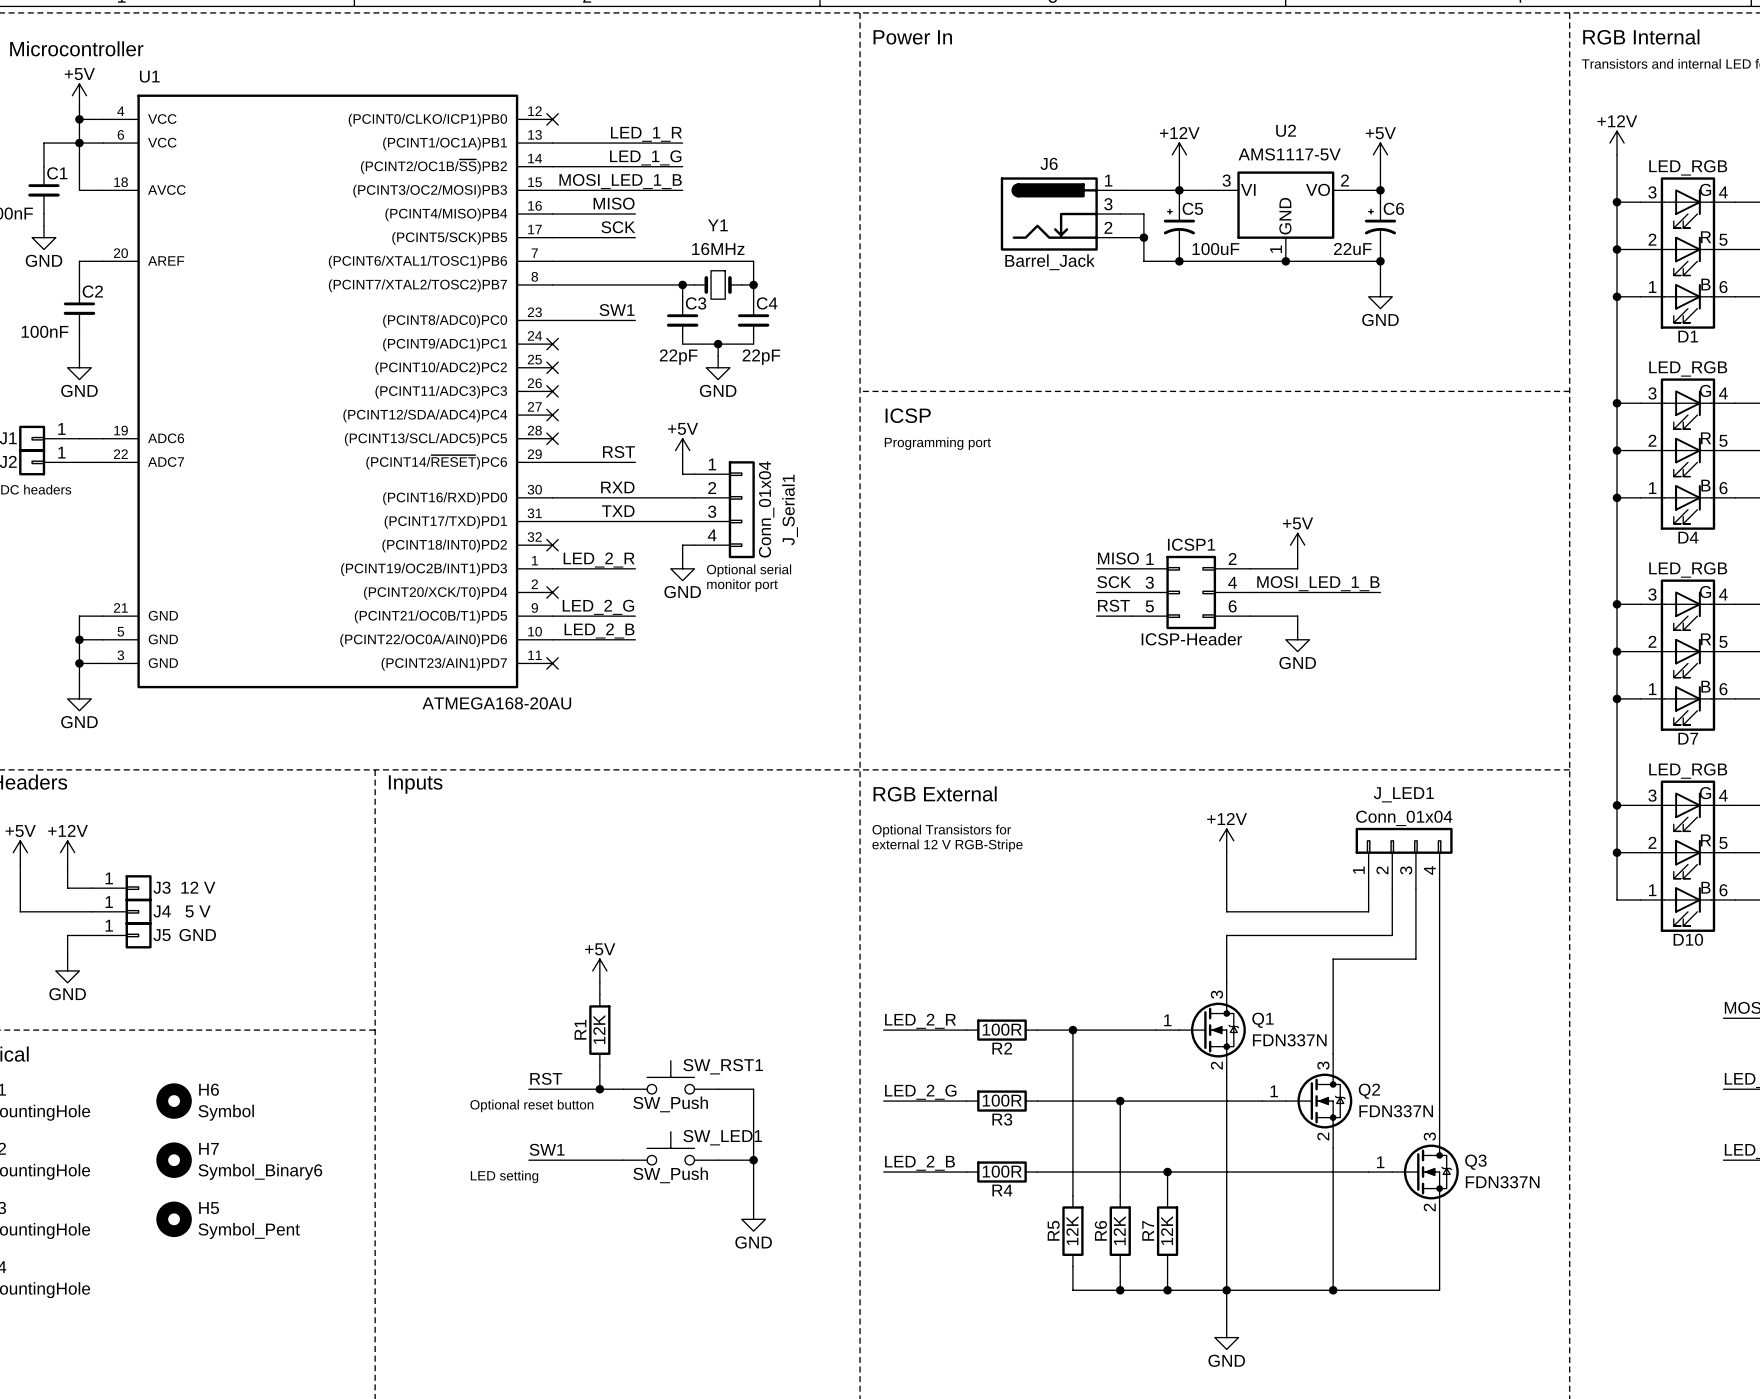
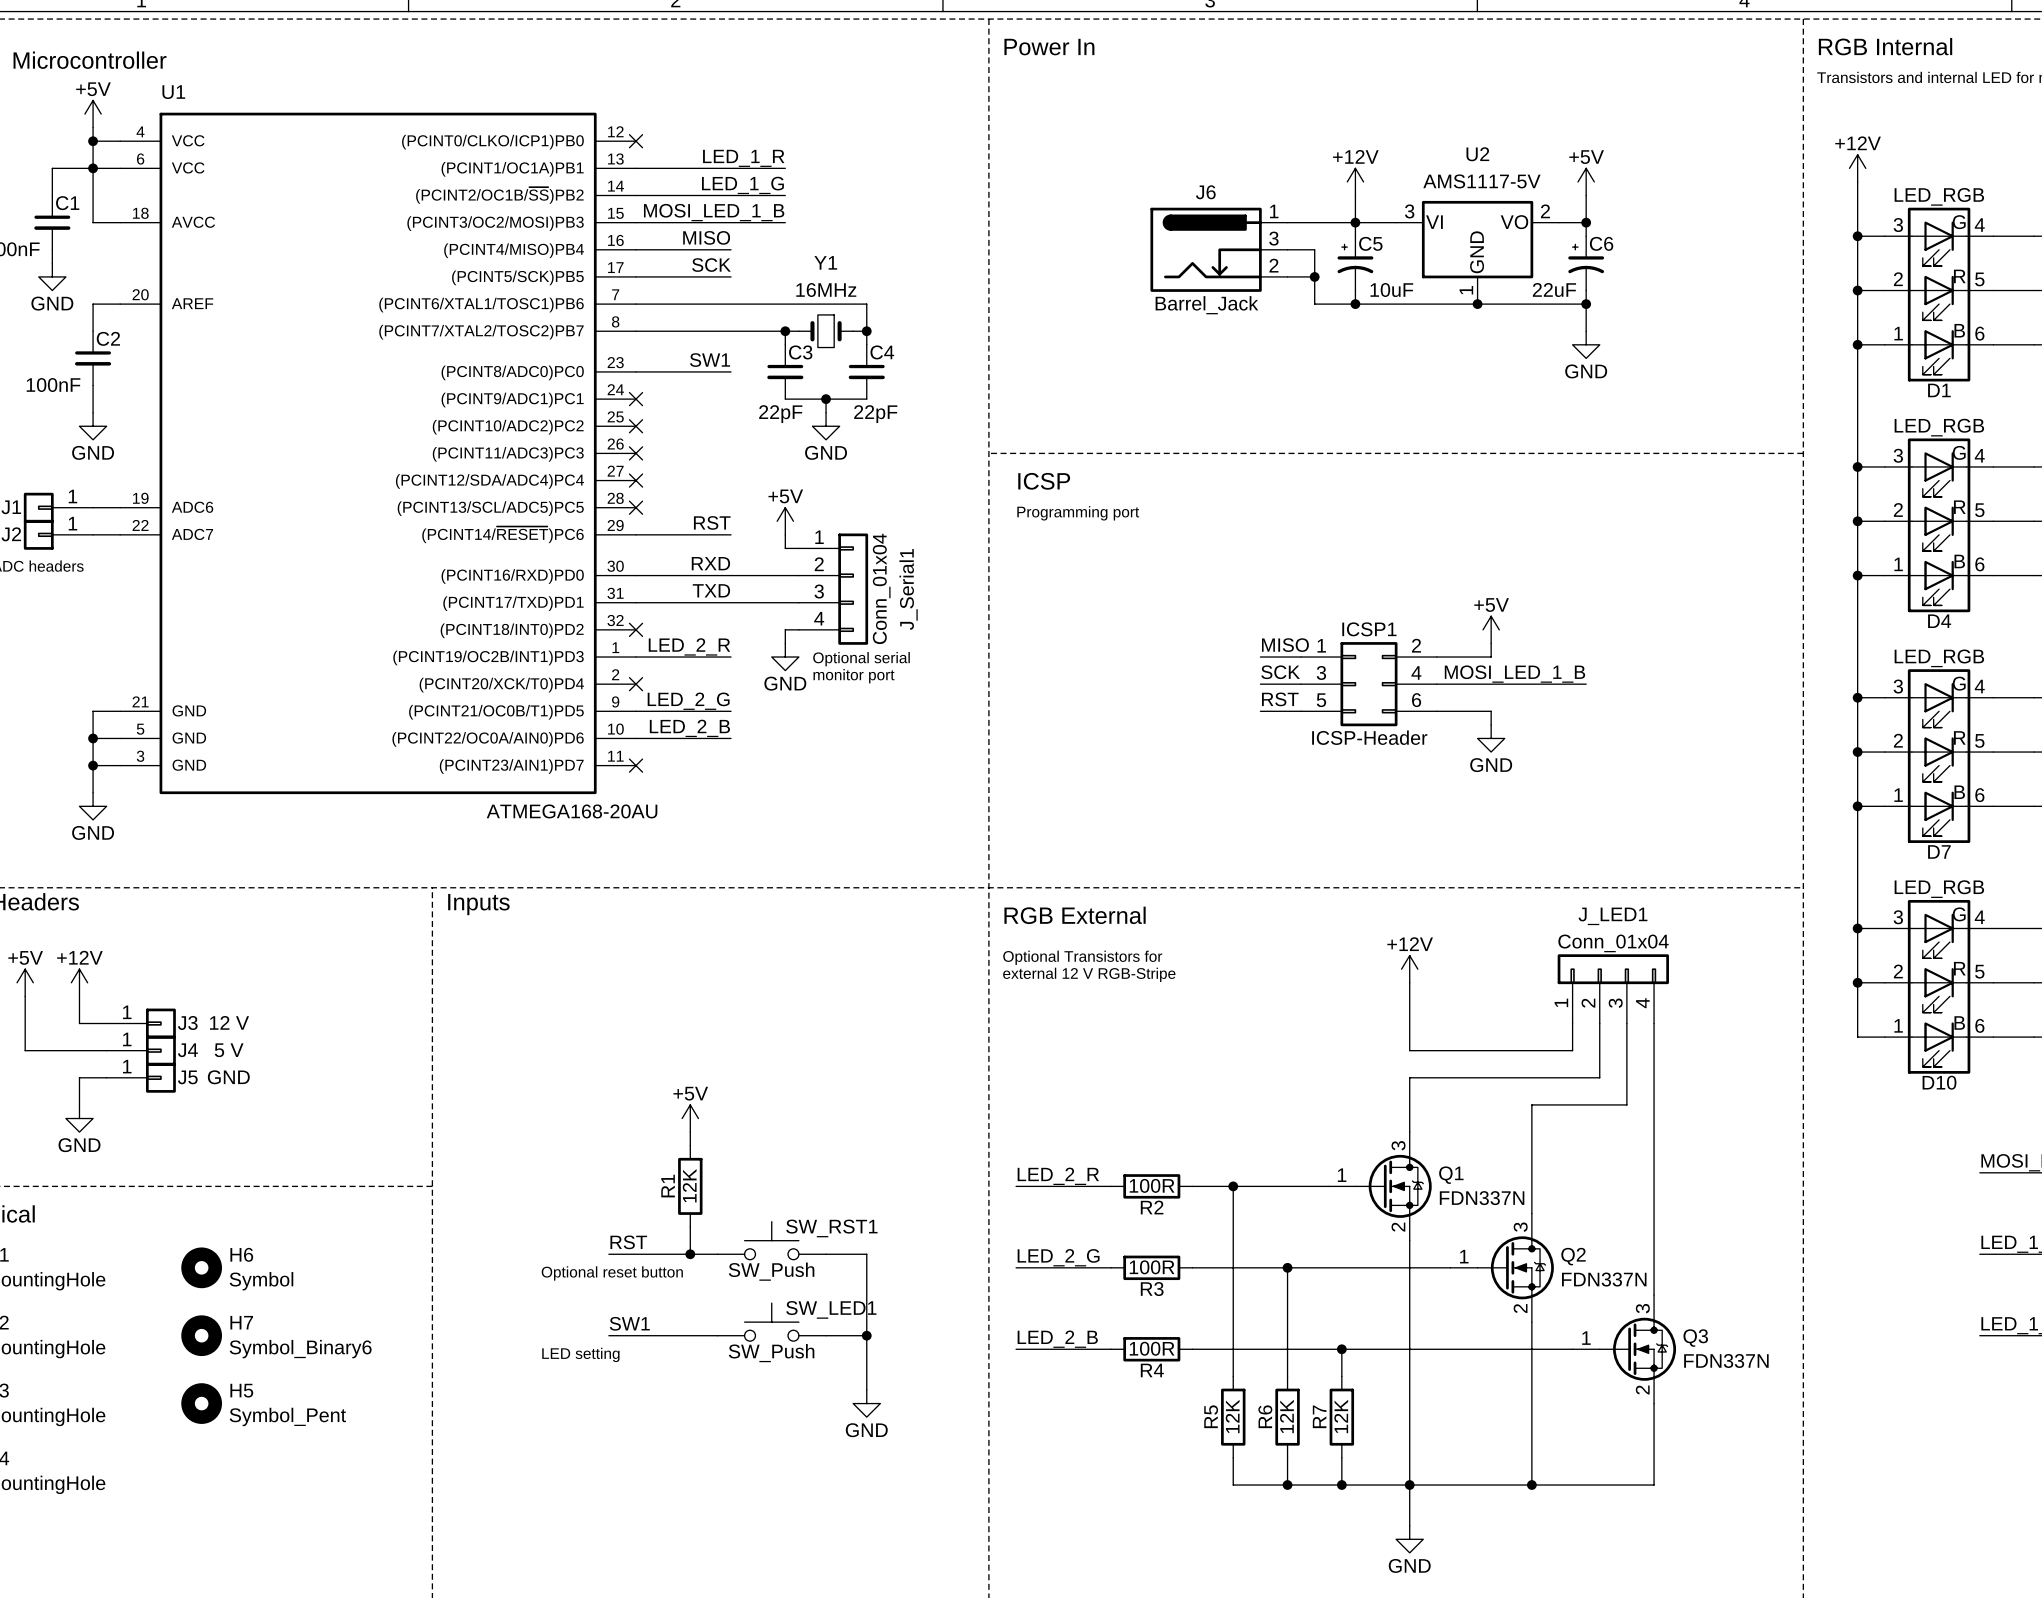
C5 value: 100uF (1215, 249) -> 10uF (1391, 290)

